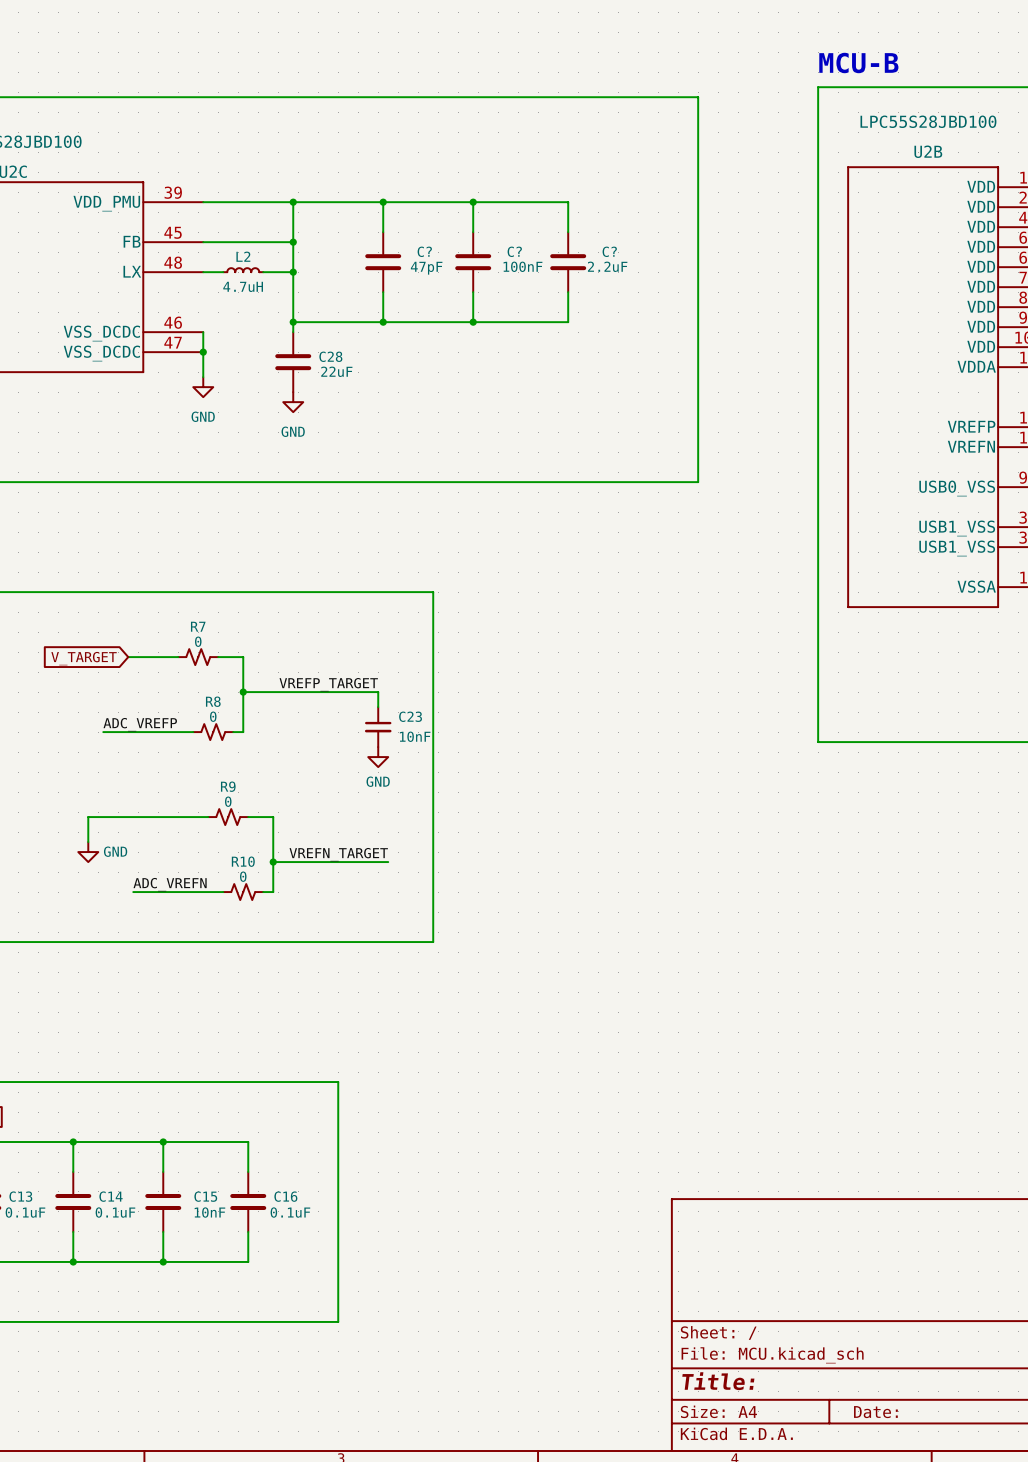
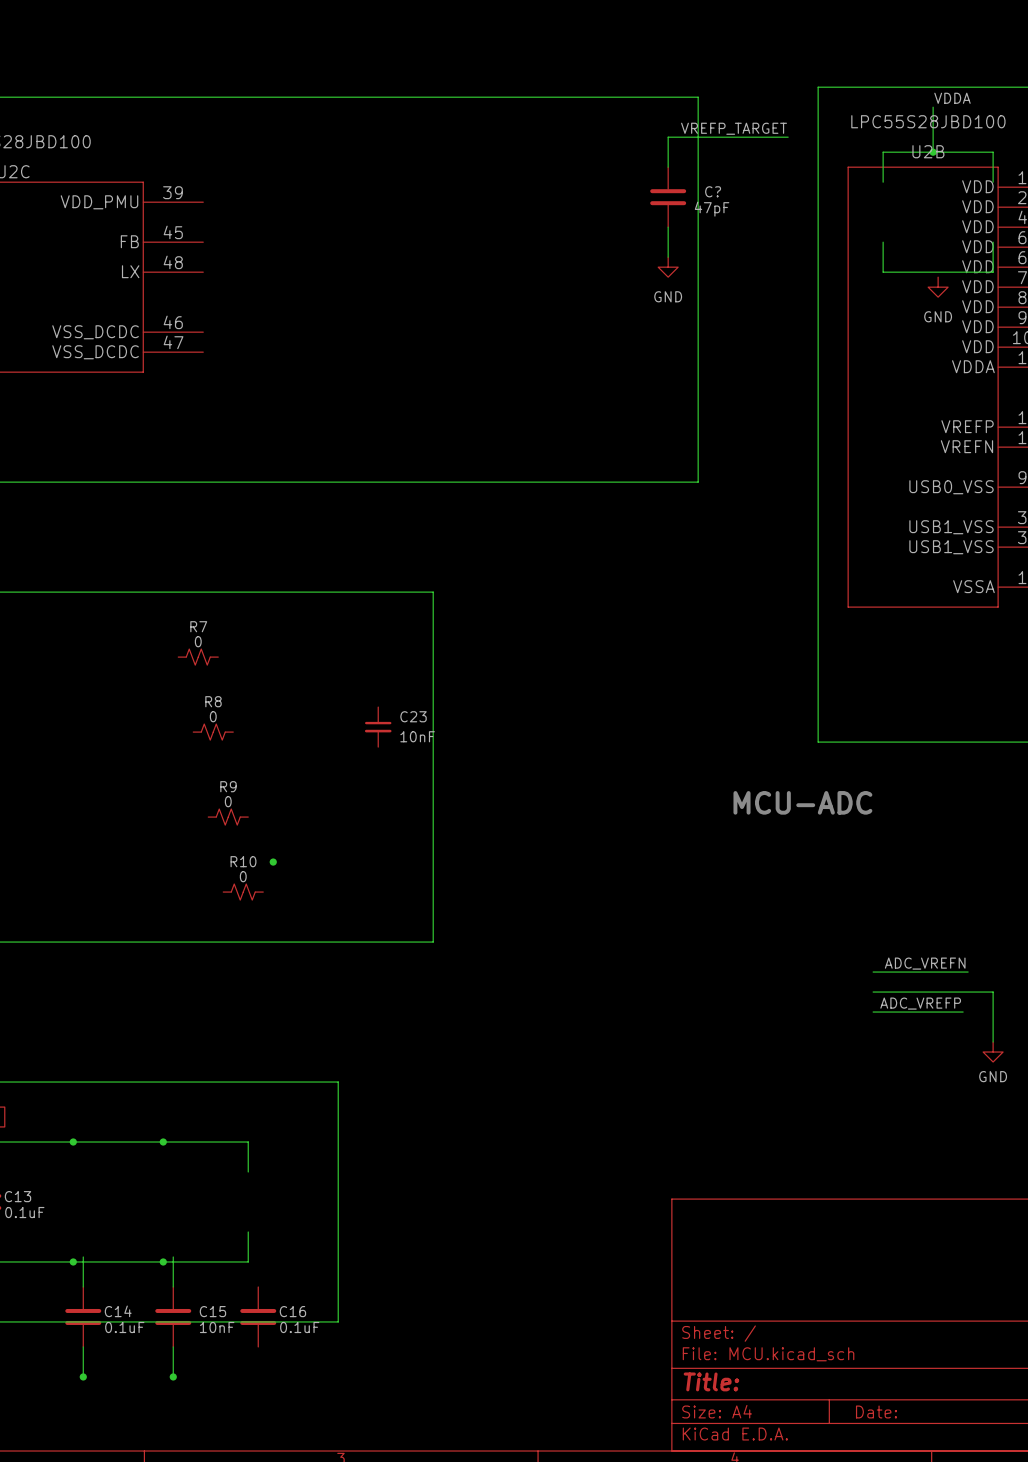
text: MCU-B (858, 63) -> none
label: none -> VDDA (952, 98)
wire: none -> (933, 107) (933, 152)
label: none -> VREFP_TARGET (734, 128)
wire: none -> (788, 137) (668, 137) (668, 167)
junction: none -> (933, 152)
wire: none -> (883, 182) (883, 152) (993, 152) (993, 182)
C?: none -> 47pF (668, 197)
wire: (203, 202) (568, 202) (568, 232) -> none
wire: (293, 202) (293, 332) -> none
junction: (293, 202) -> none
wire: (383, 202) (383, 232) -> none
junction: (383, 202) -> none
wire: (473, 202) (473, 232) -> (668, 227) (668, 257)
junction: (473, 202) -> none
wire: (203, 242) (293, 242) -> none
junction: (293, 242) -> none
wire: none -> (883, 242) (883, 272) (993, 272) (993, 242)
C?: 47pF (383, 262) -> none
C?: 100nF (473, 262) -> none
C?: 2.2uF (568, 262) -> none
power symbol: none -> GND (668, 267)
L2: 4.7uH (243, 270) -> none
wire: (203, 272) (223, 272) -> none
wire: (263, 272) (293, 272) -> none
junction: (293, 272) -> none
power symbol: none -> GND (938, 287)
wire: (383, 292) (383, 322) -> none
wire: (473, 292) (473, 322) -> none
wire: (568, 292) (568, 322) (293, 322) -> none
junction: (293, 322) -> none
junction: (383, 322) -> none
junction: (473, 322) -> none
wire: (203, 332) (203, 377) -> none
junction: (203, 352) -> none
C28: 22uF (293, 362) -> none
power symbol: GND (203, 387) -> none
power symbol: GND (293, 402) -> none
wire: (128, 657) (178, 657) -> none
wire: (218, 657) (243, 657) (243, 732) (233, 732) -> none
global label: V_TARGET (84, 658) -> none
label: VREFP_TARGET (328, 684) -> none
wire: (243, 692) (378, 692) (378, 707) -> none
junction: (243, 692) -> none
label: ADC_VREFP (140, 724) -> none
wire: (103, 732) (193, 732) -> none
power symbol: GND (378, 757) -> none
text: none -> MCU-ADC (802, 802)
wire: (208, 817) (88, 817) (88, 842) -> none
wire: (248, 817) (273, 817) (273, 892) (263, 892) -> none
power symbol: GND (88, 852) -> none
label: VREFN_TARGET (338, 854) -> none
wire: (273, 862) (388, 862) -> none
label: ADC_VREFN (170, 884) -> none
wire: (133, 892) (223, 892) -> none
label: none -> ADC_VREFN (925, 963)
wire: none -> (873, 972) (968, 972)
wire: none -> (873, 992) (993, 992) (993, 1042)
label: none -> ADC_VREFP (920, 1003)
wire: none -> (873, 1012) (963, 1012)
power symbol: none -> GND (993, 1052)
wire: (73, 1142) (73, 1172) -> (83, 1256) (83, 1286)
wire: (163, 1142) (163, 1172) -> (173, 1256) (173, 1286)
C14 position: (73, 1201) -> (83, 1316)
C15 position: (163, 1201) -> (173, 1316)
C16 position: (248, 1201) -> (258, 1316)
wire: (73, 1231) (73, 1261) -> (83, 1346) (83, 1376)
wire: (163, 1231) (163, 1261) -> (173, 1346) (173, 1376)
junction: none -> (83, 1376)
junction: none -> (173, 1376)

